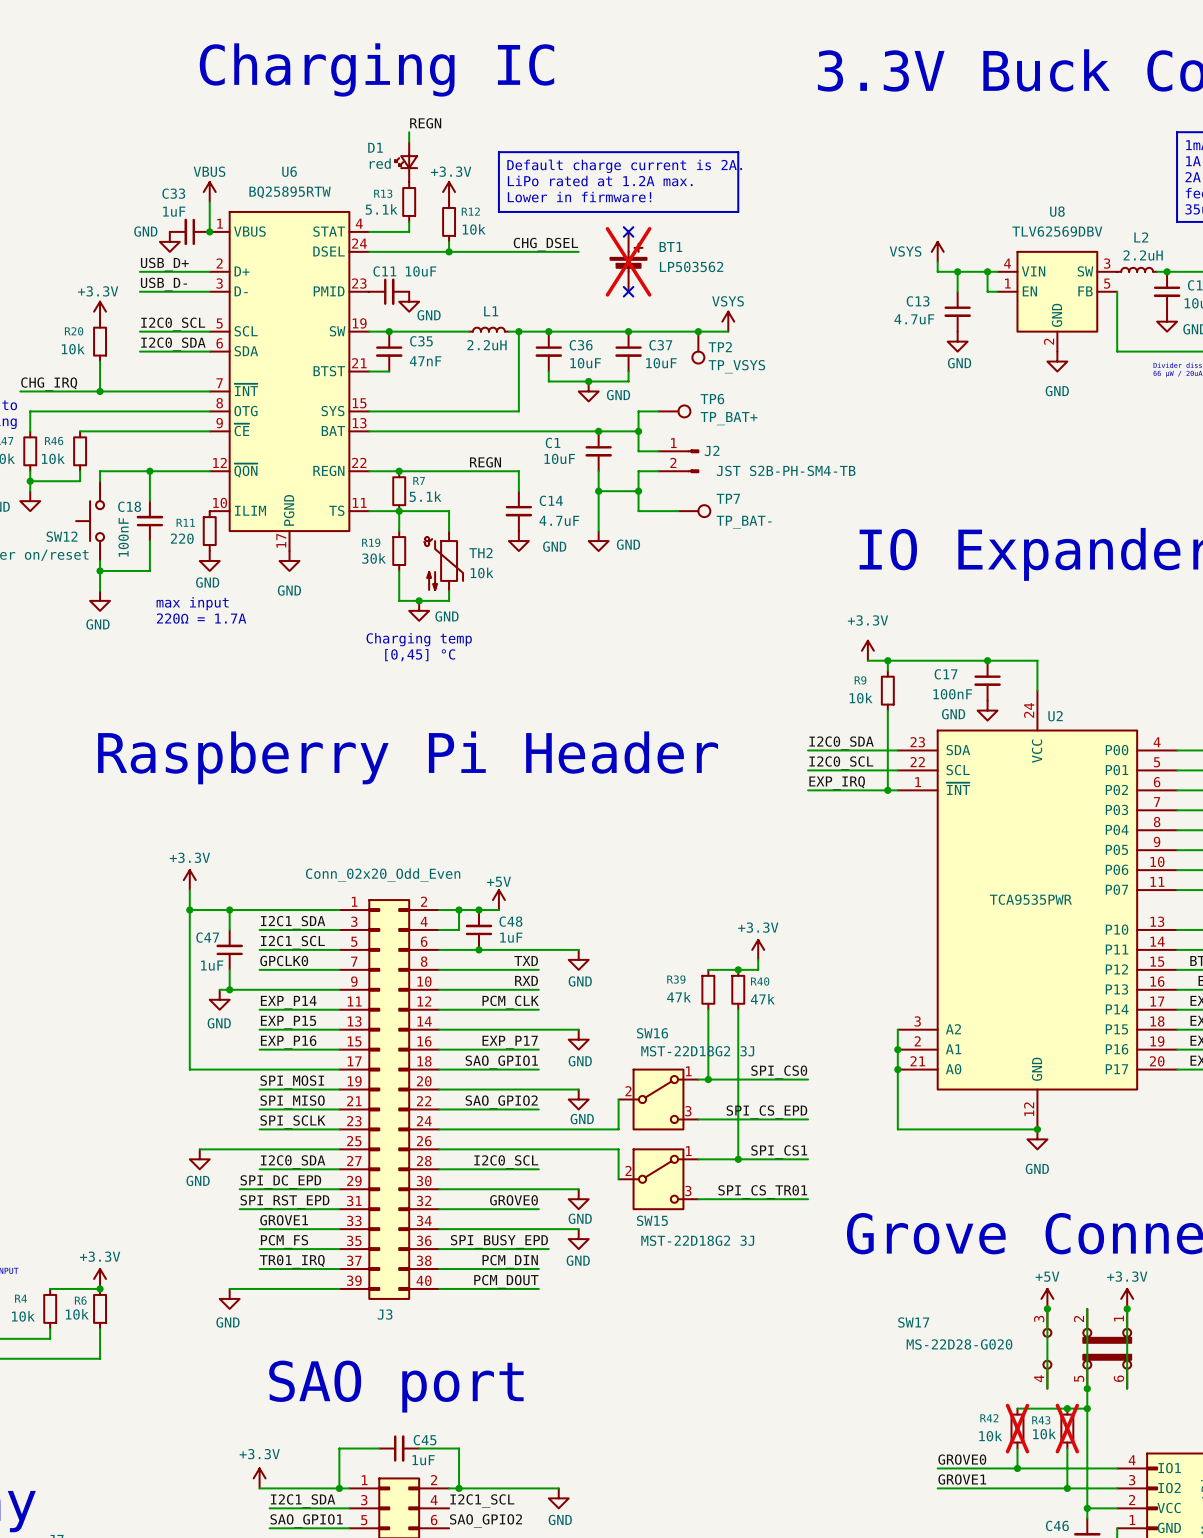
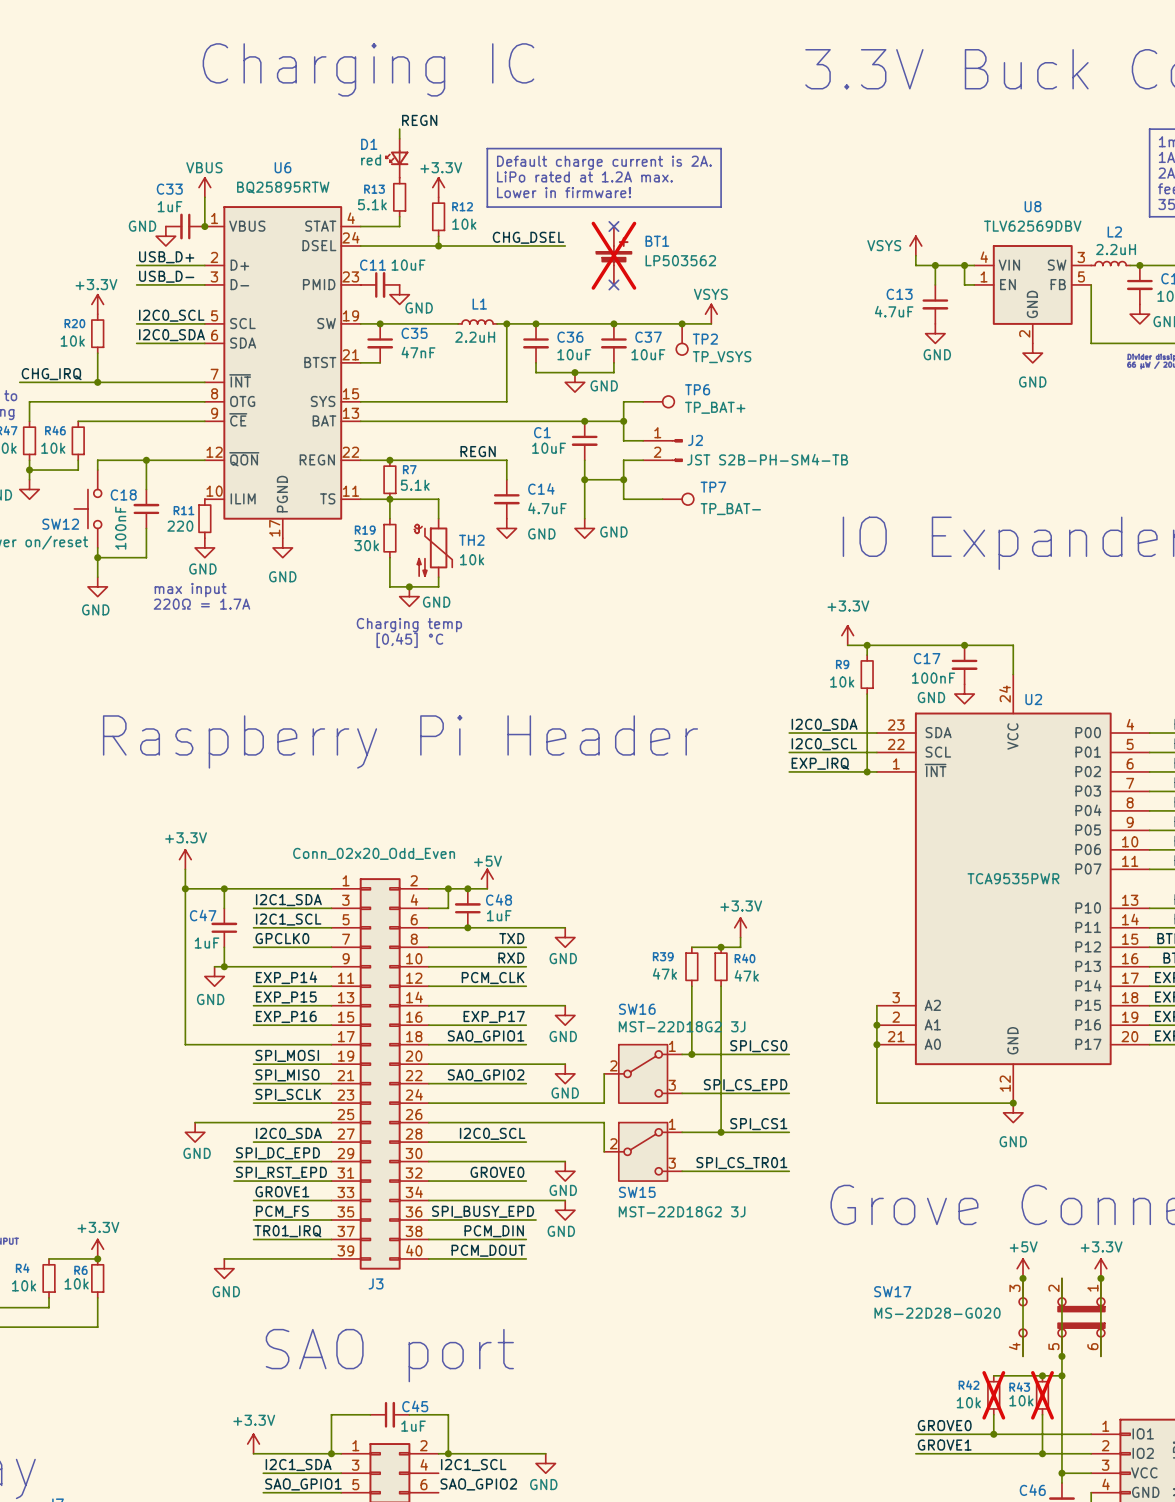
part pin number: 4 (1132, 1460) -> 1 (1105, 1426)
part pin number: 3 (1132, 1480) -> 2 (1105, 1445)
part pin number: 2 (1132, 1500) -> 3 (1105, 1465)
part pin number: 1 (1132, 1520) -> 4 (1106, 1484)

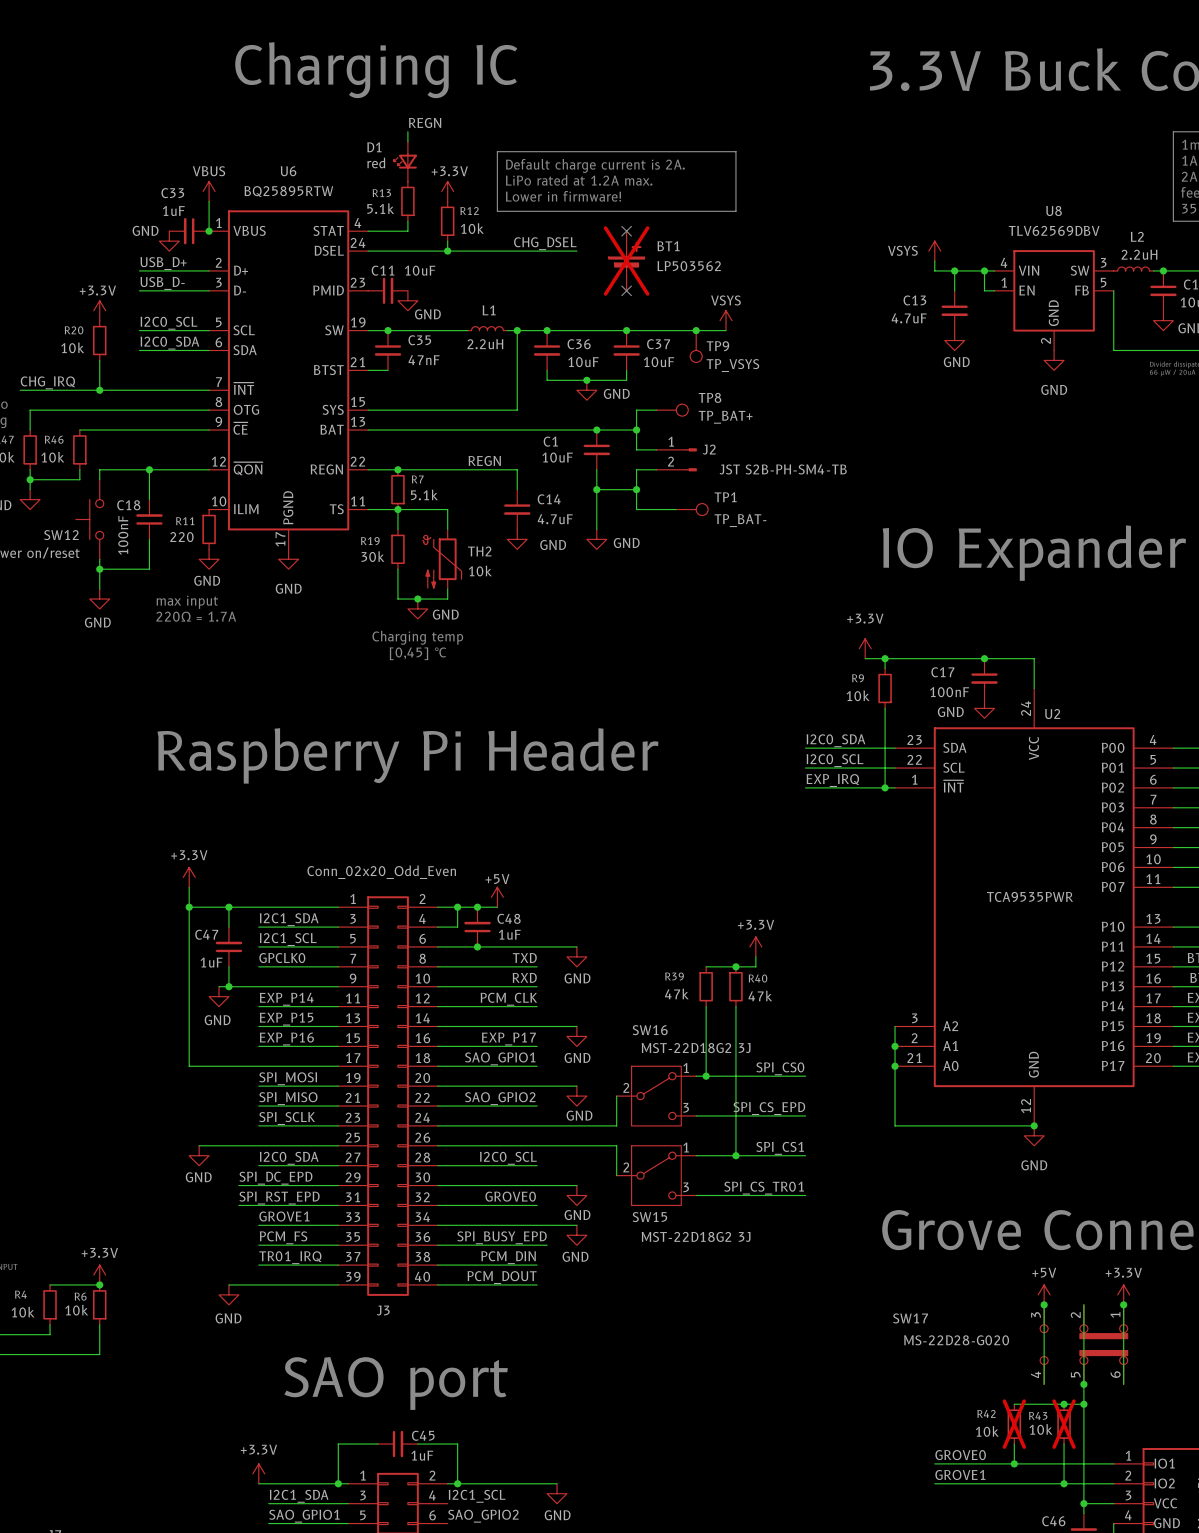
TP2 name: TP2 (705, 339) -> TP9 (717, 346)
TP6 name: TP6 (697, 389) -> TP8 (710, 397)
TP7 name: TP7 (713, 487) -> TP1 (725, 497)

